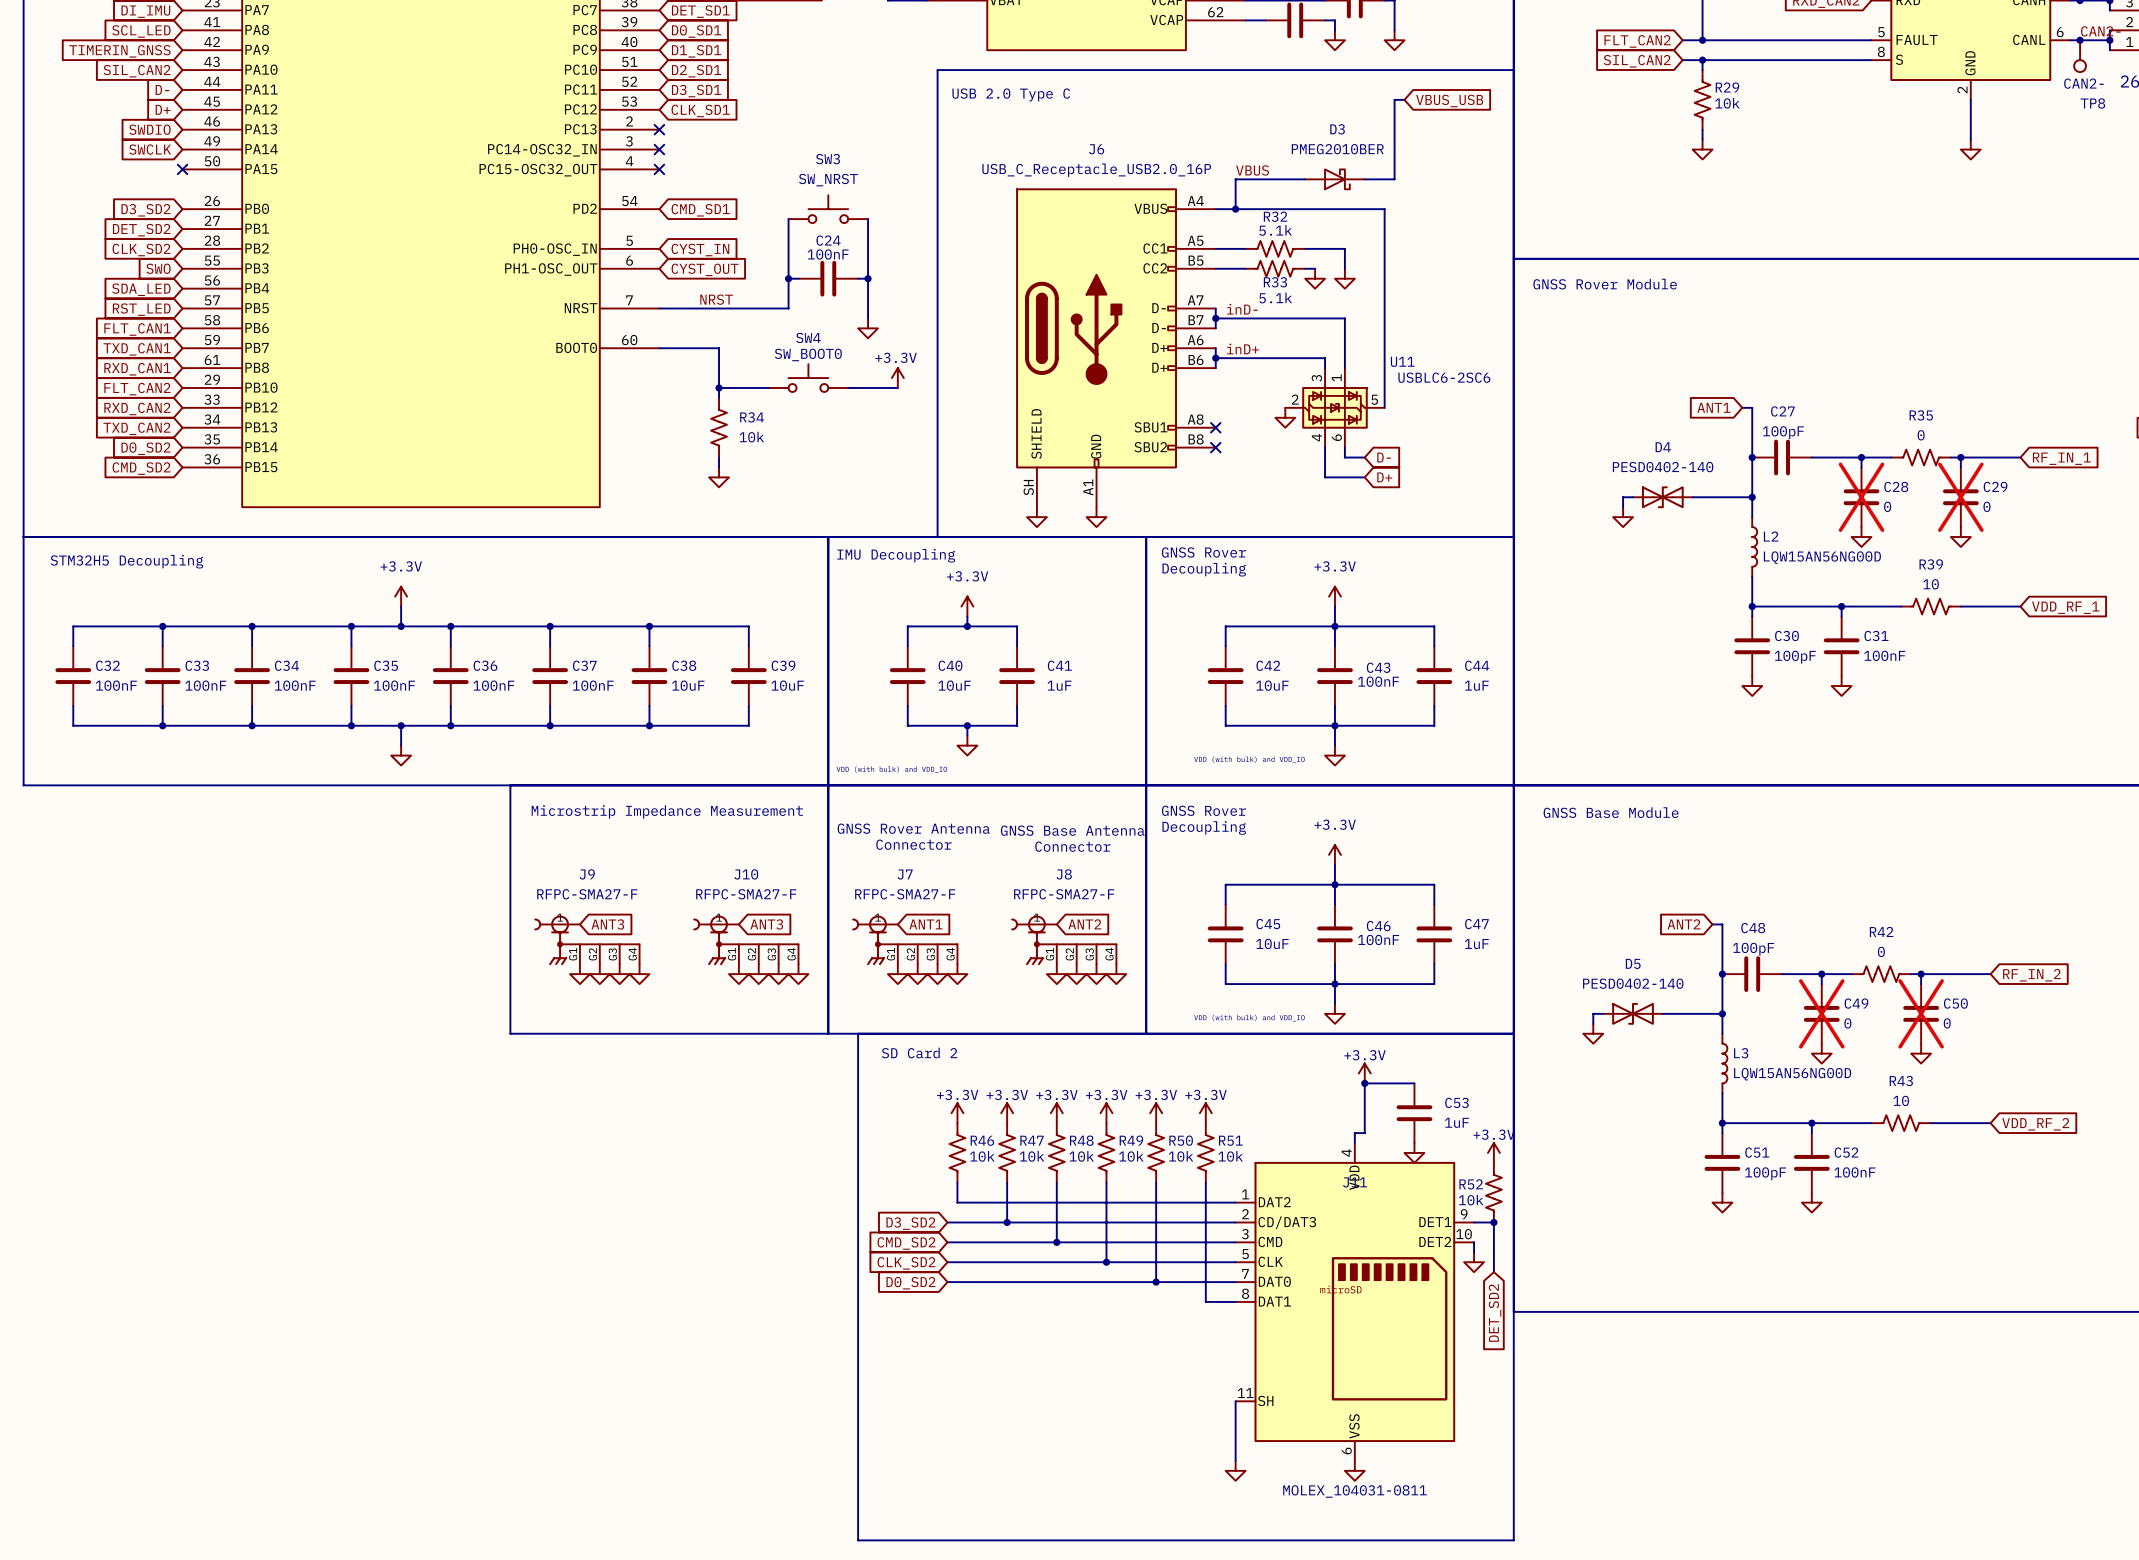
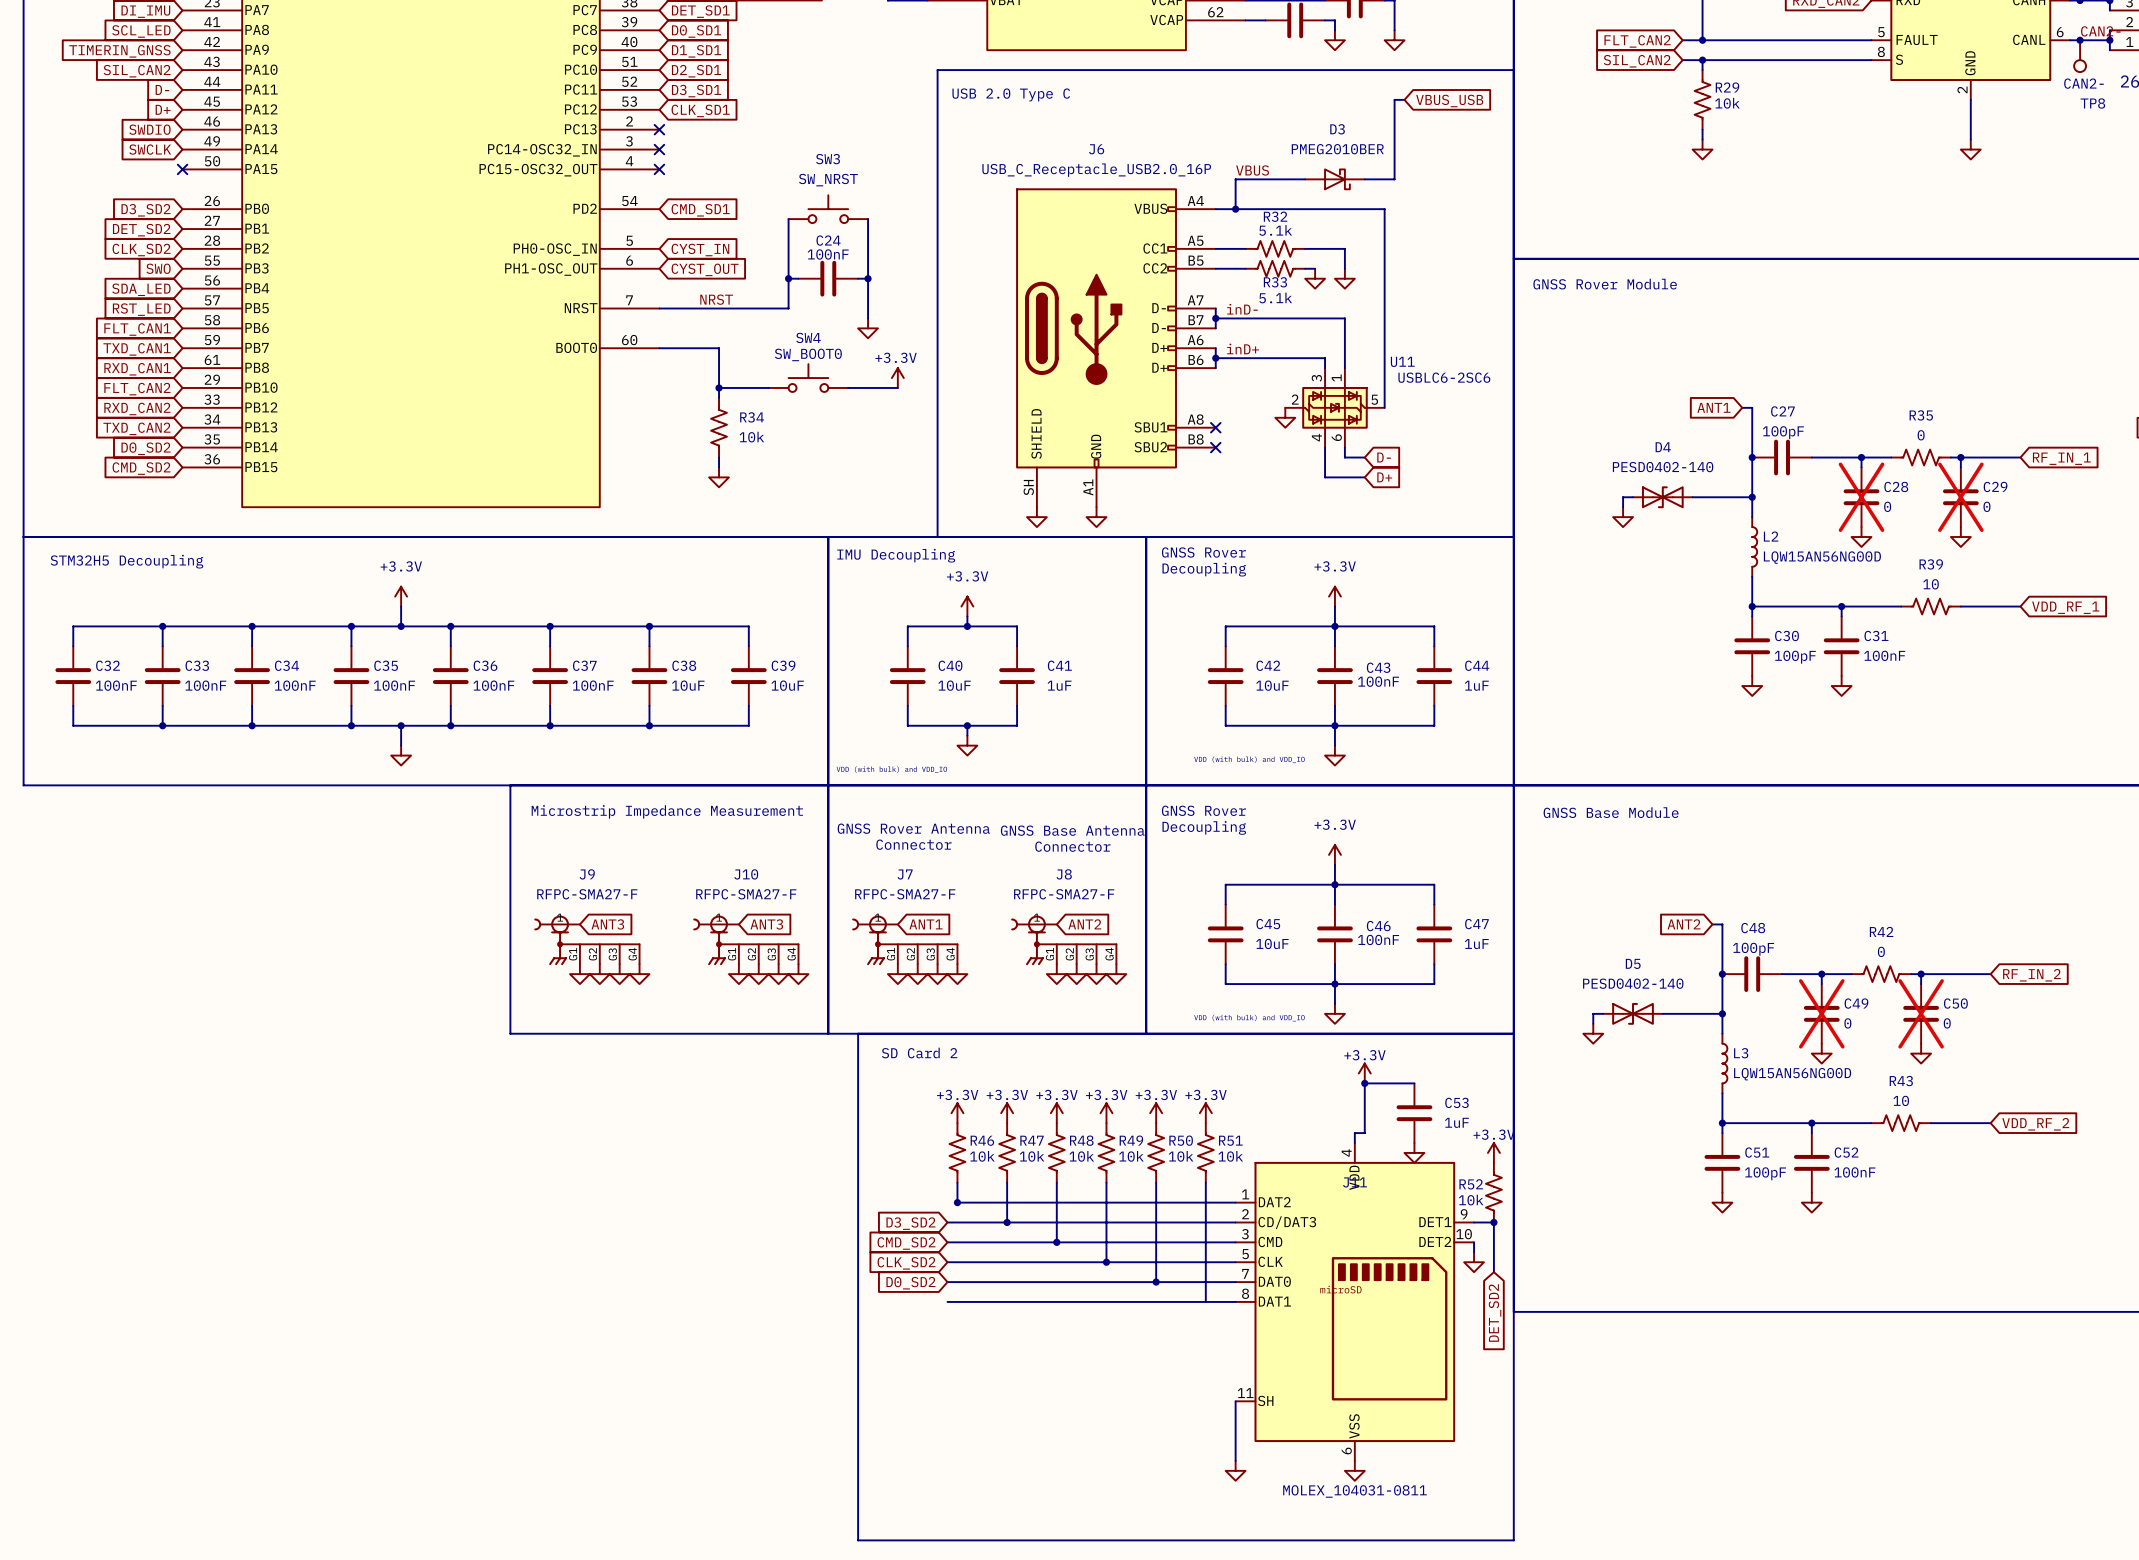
junction: none -> (957, 1202)
wire: none -> (947, 1301) (1205, 1301)

